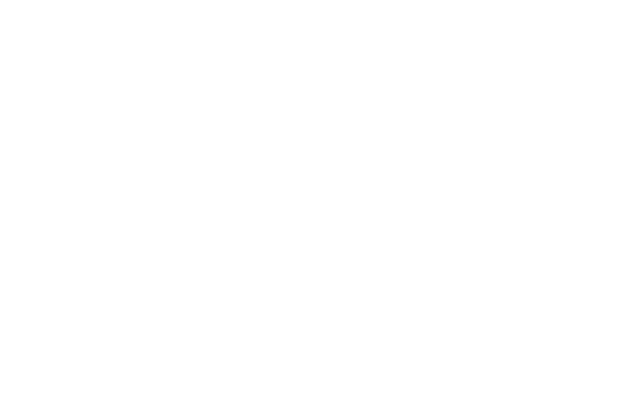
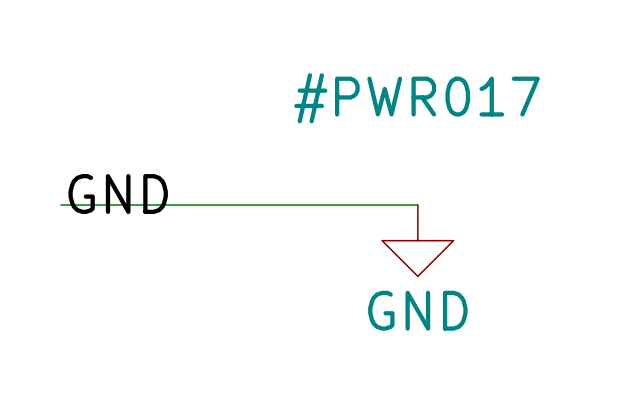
label: none -> GND (118, 194)
wire: none -> (60, 204) (417, 204)
#PWR017: none -> GND (417, 240)

